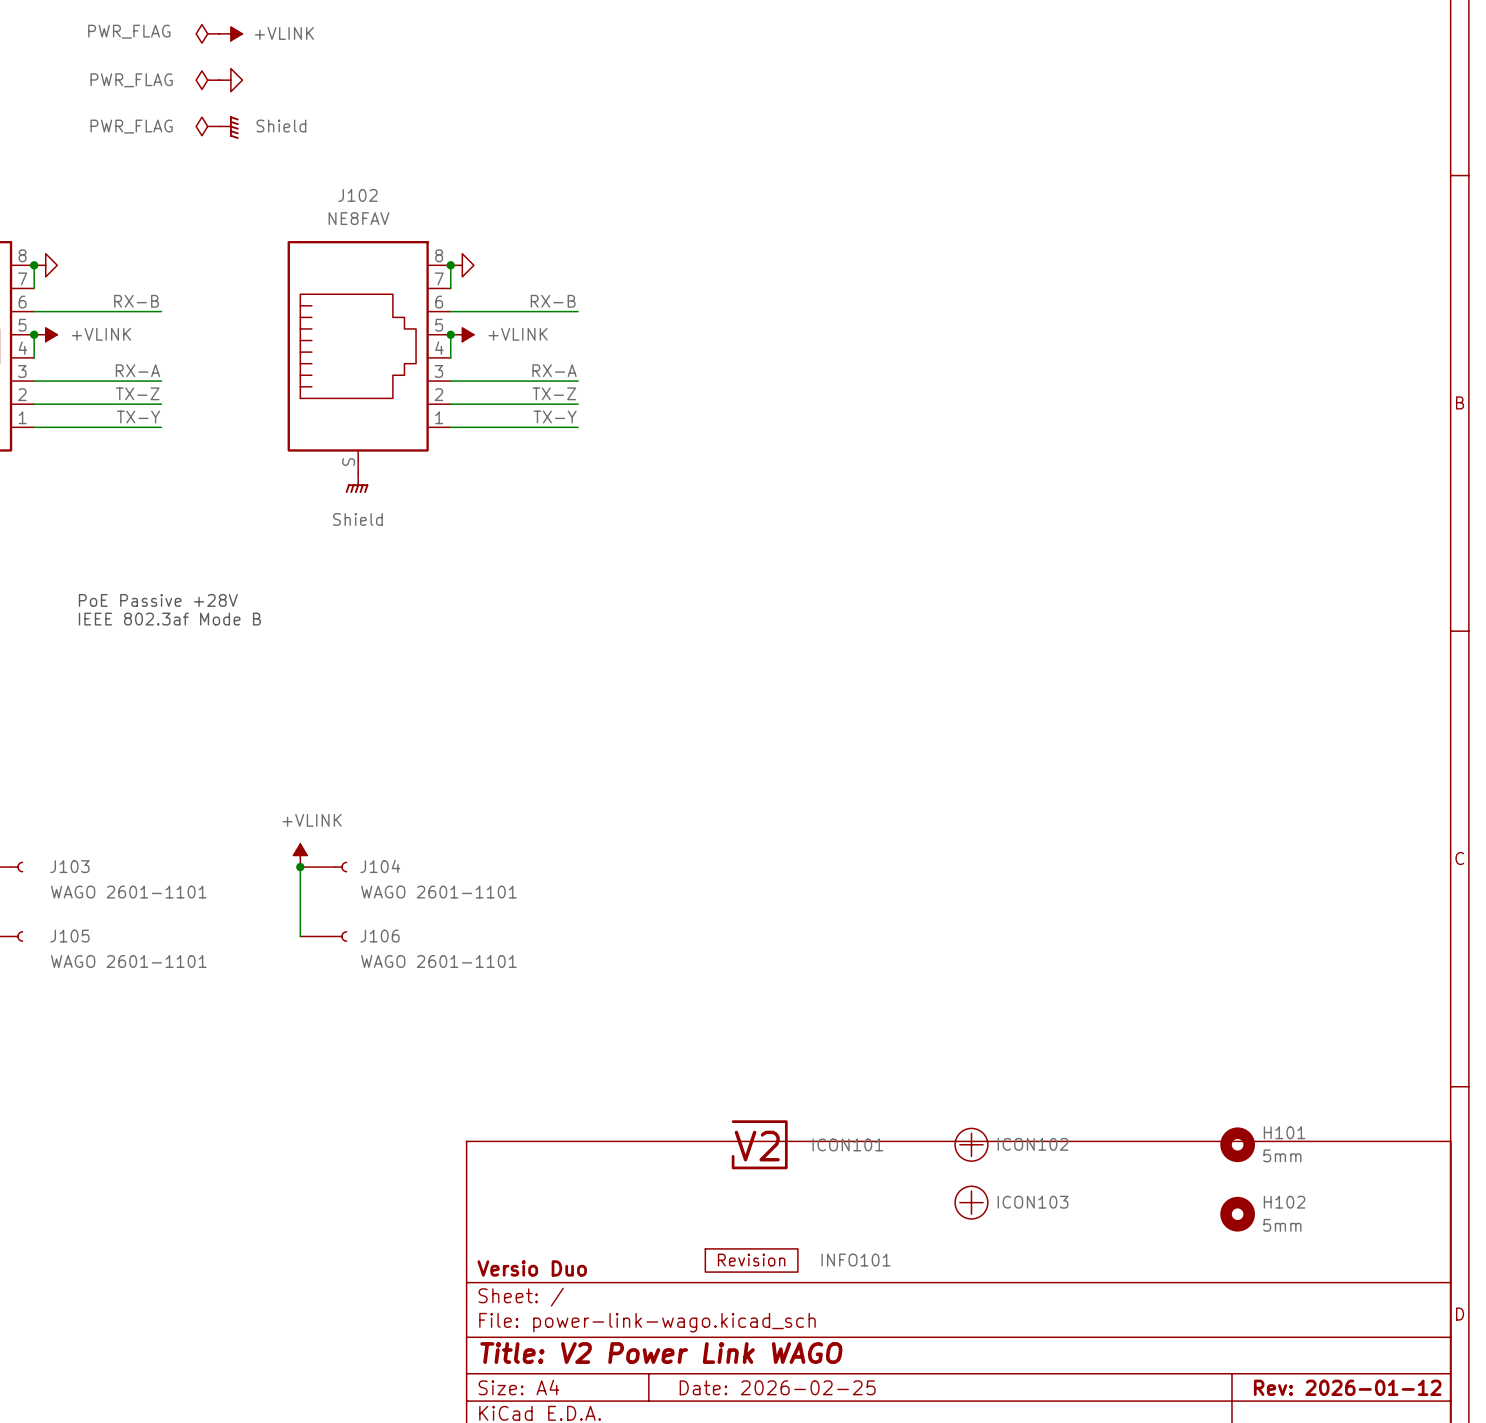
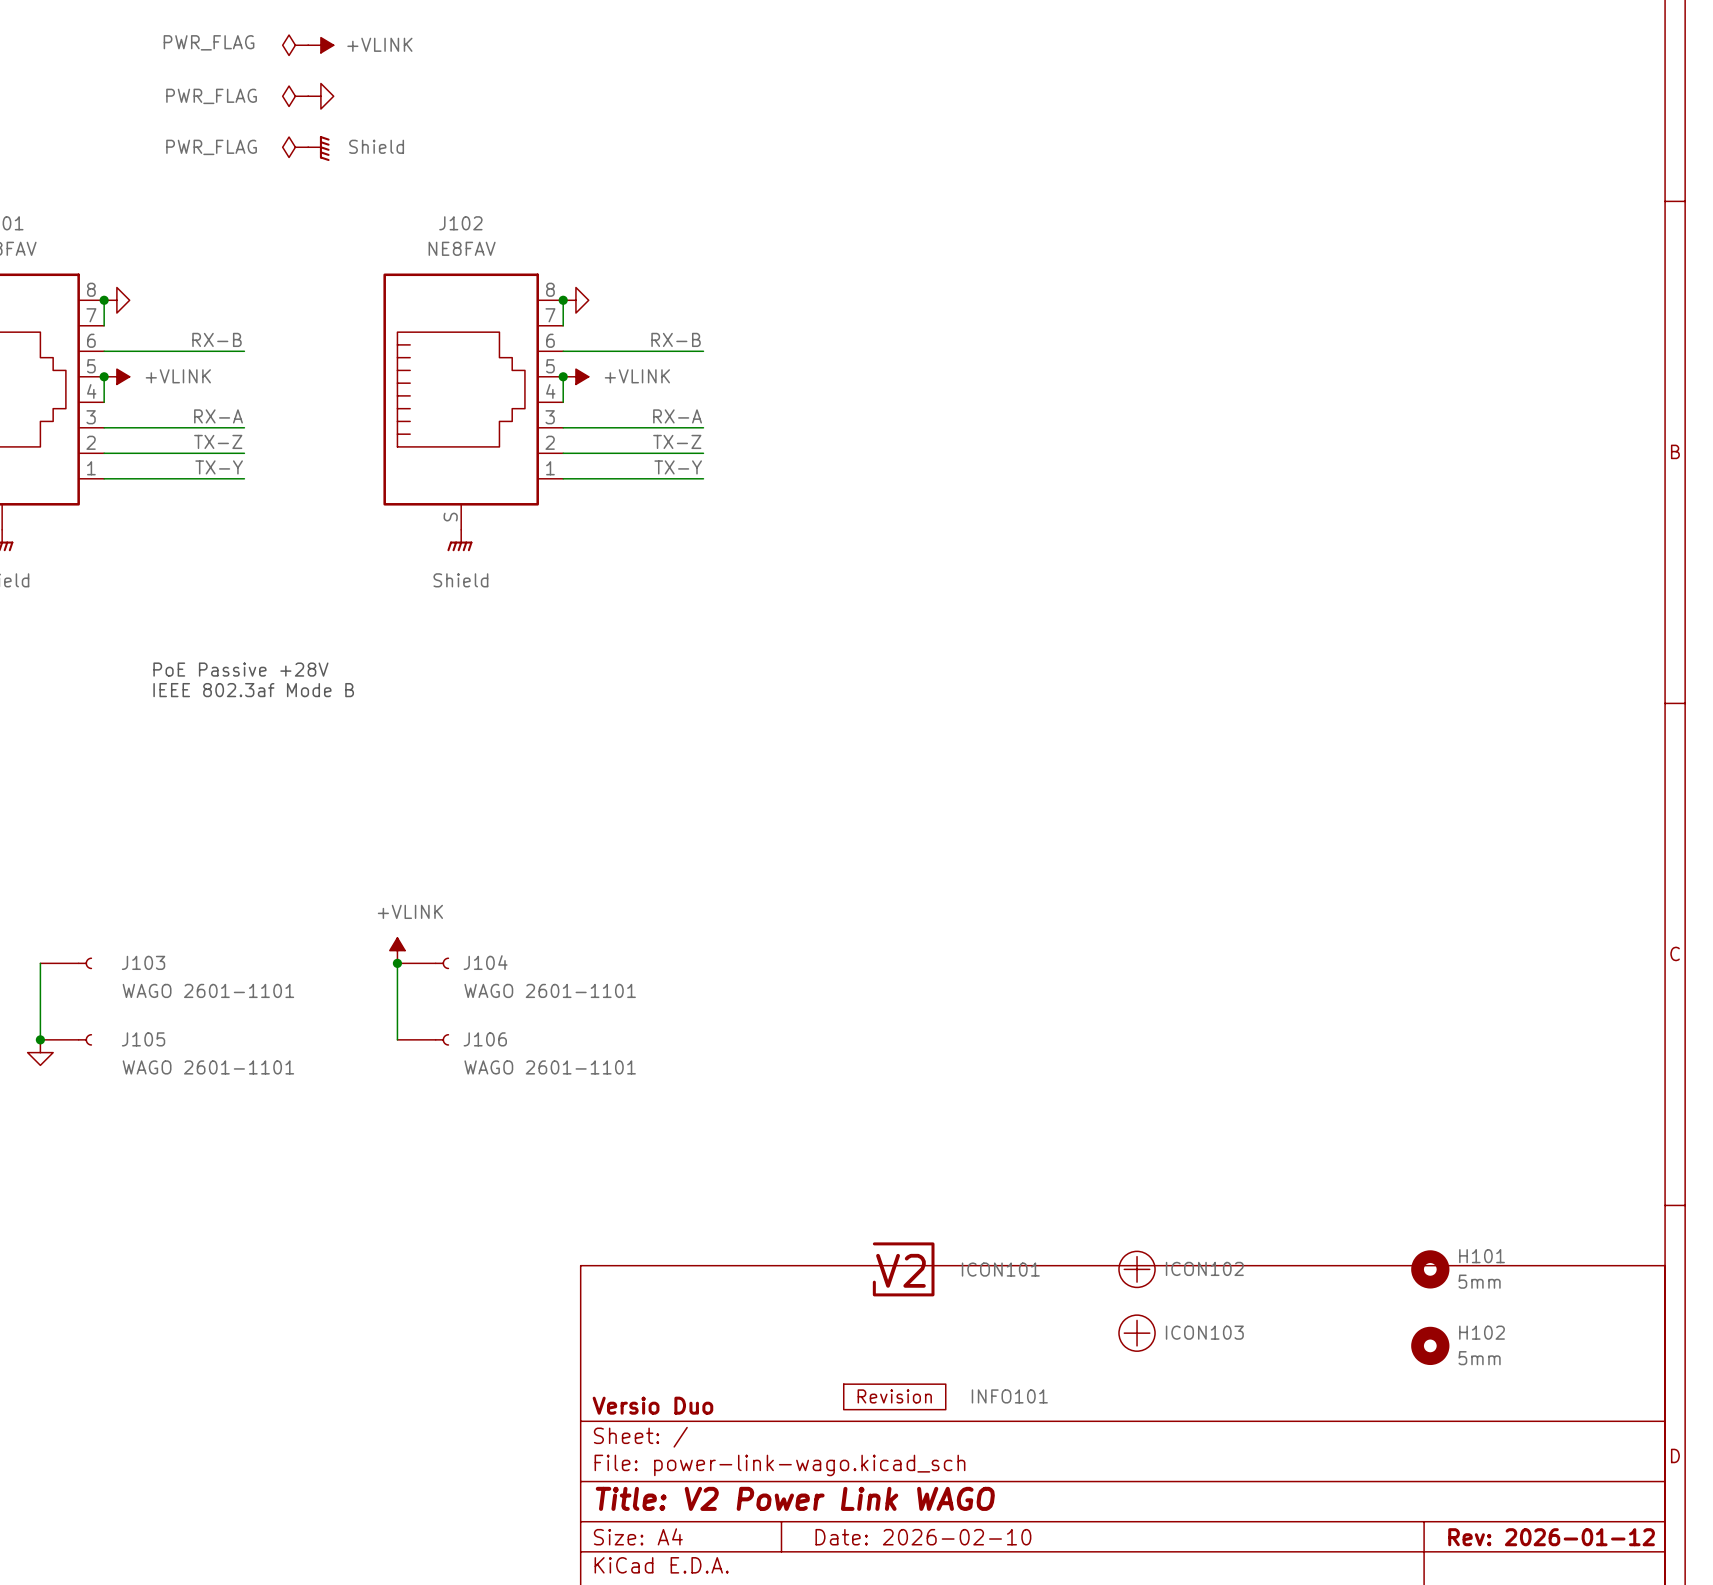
title block: Date: 2026-02-25 (777, 1387) -> Date: 2026-02-10 (923, 1537)

